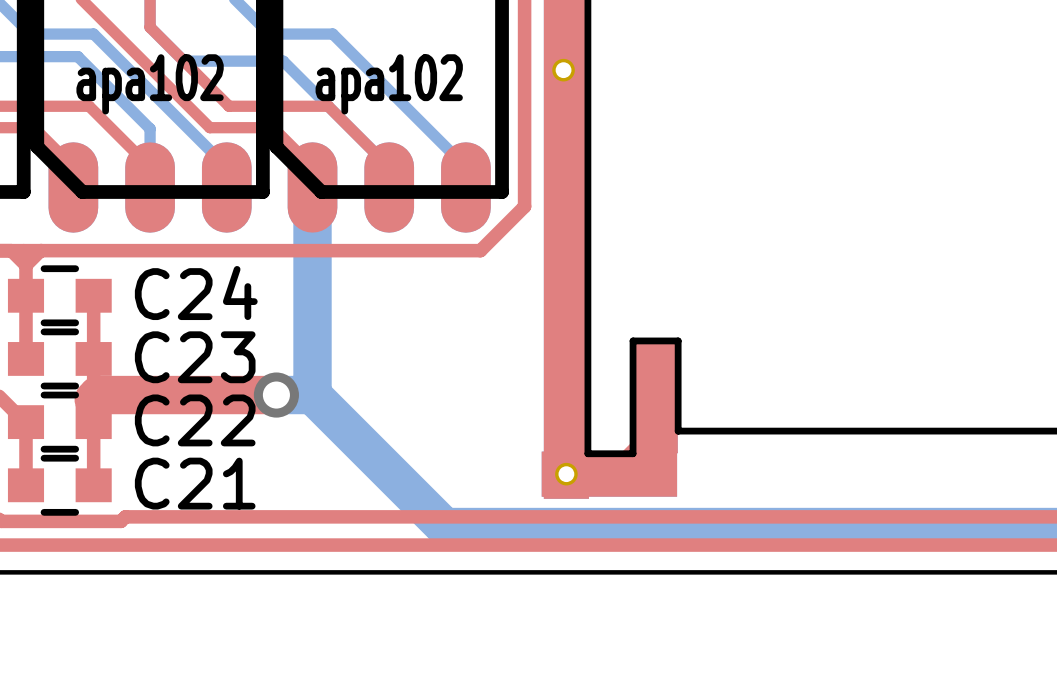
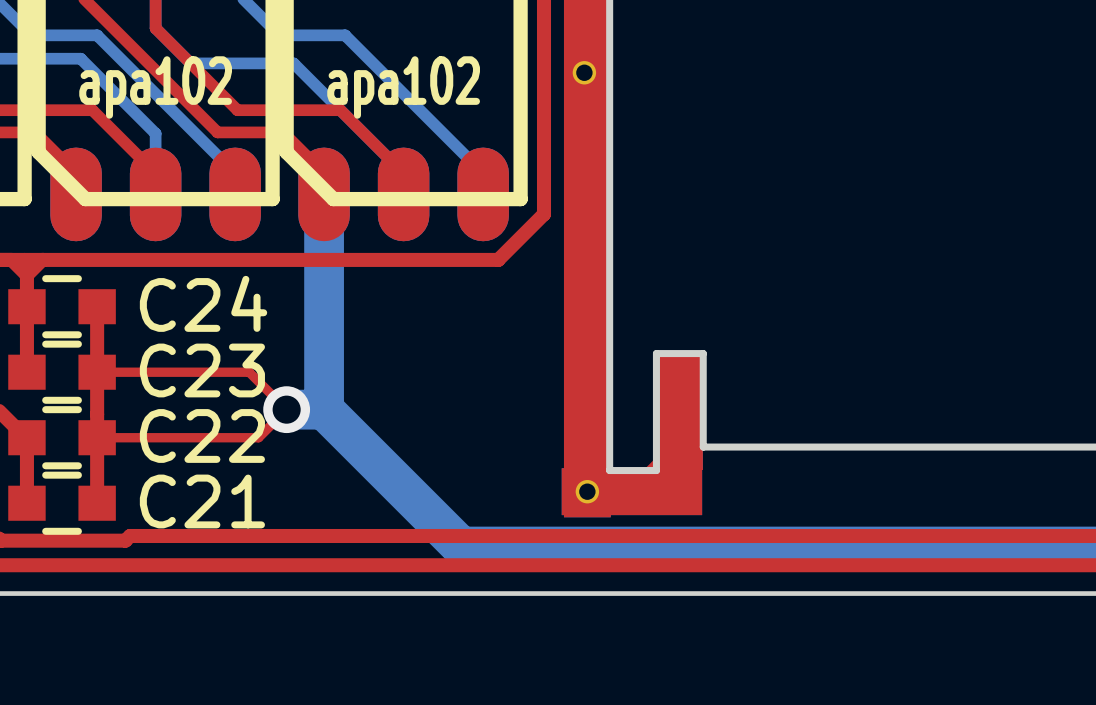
top track: none -> (97, 372) (249, 372) (286, 409) (258, 437) (97, 437)
top track: (276, 395) (98, 395) (93, 399) -> none

